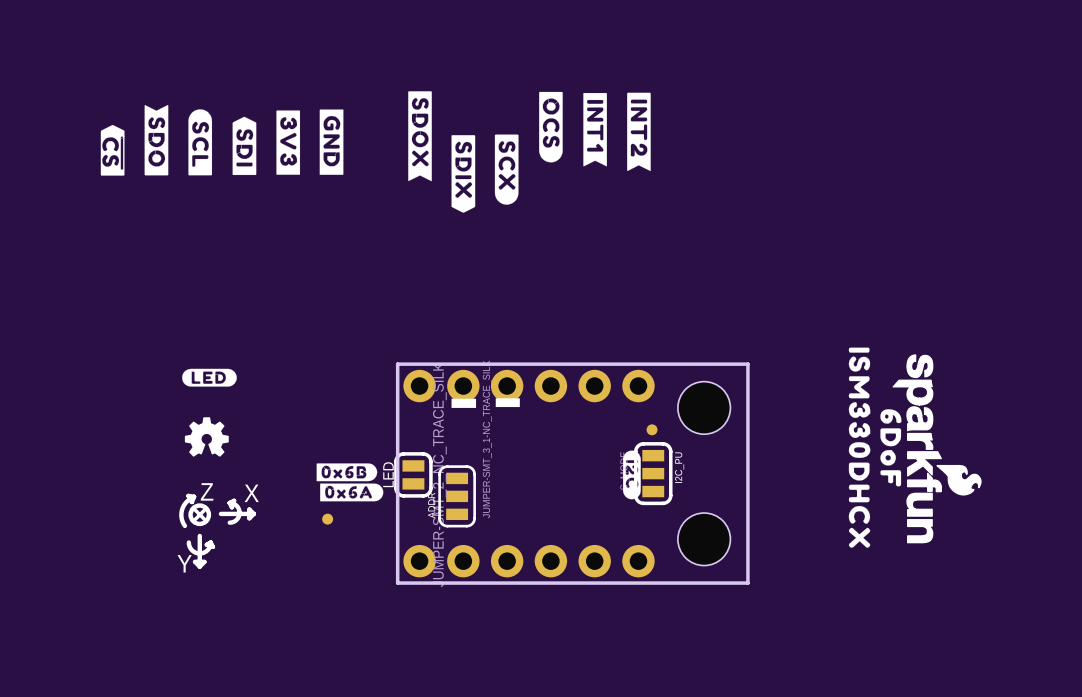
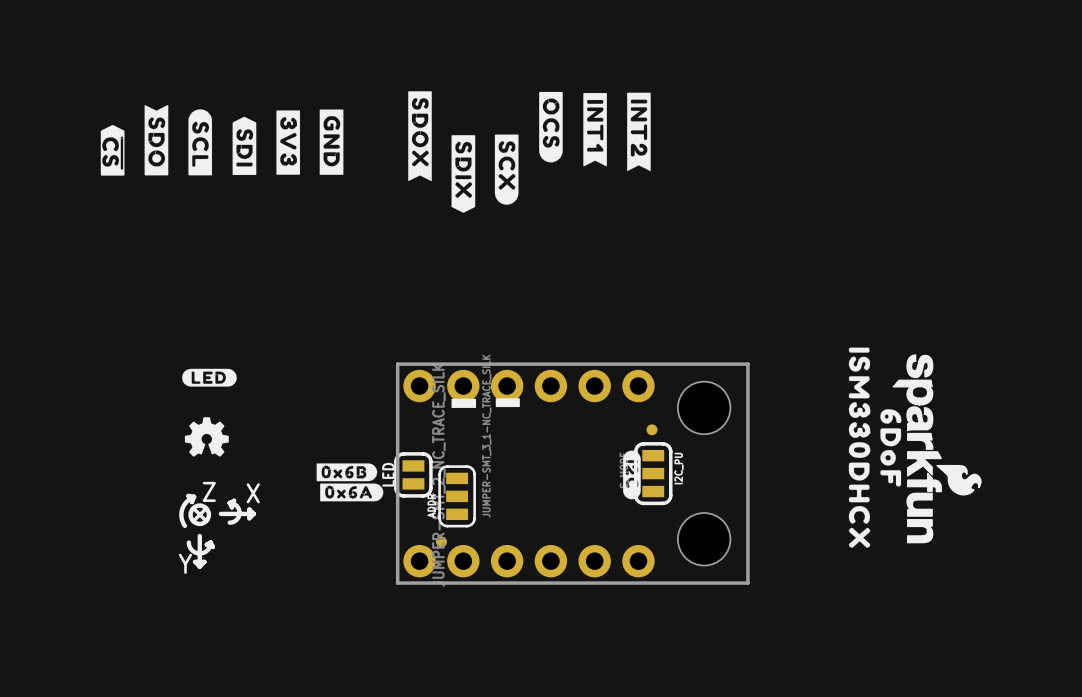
part position: (327, 519) -> (441, 541)

